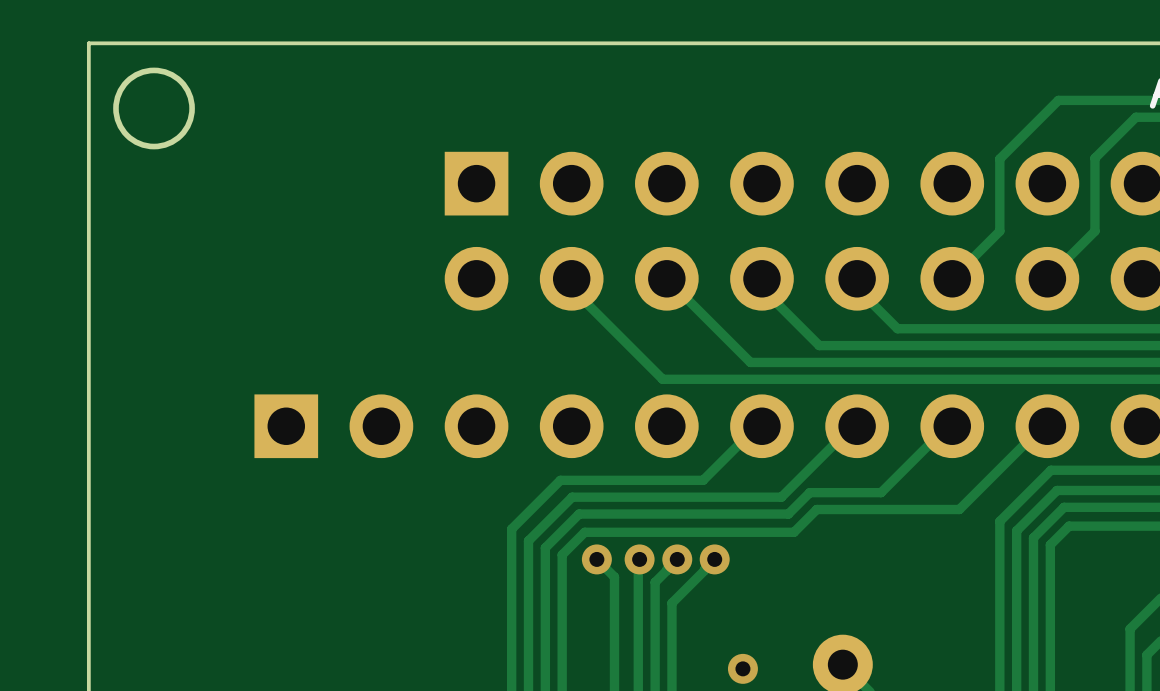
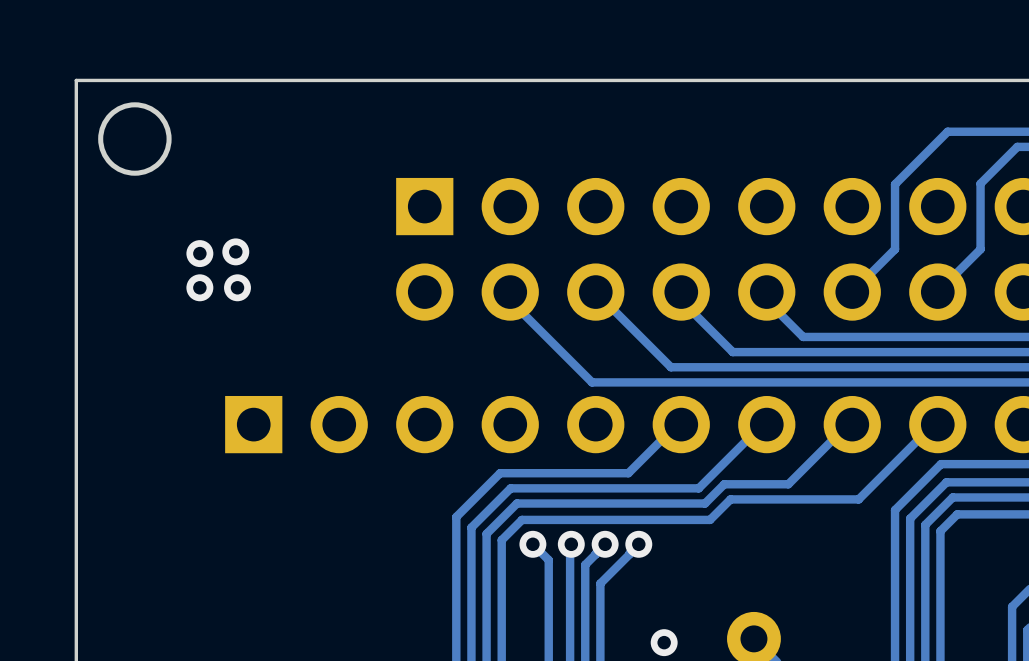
via: none -> (235, 251)
via: none -> (199, 253)
via: none -> (199, 287)
via: none -> (237, 287)

